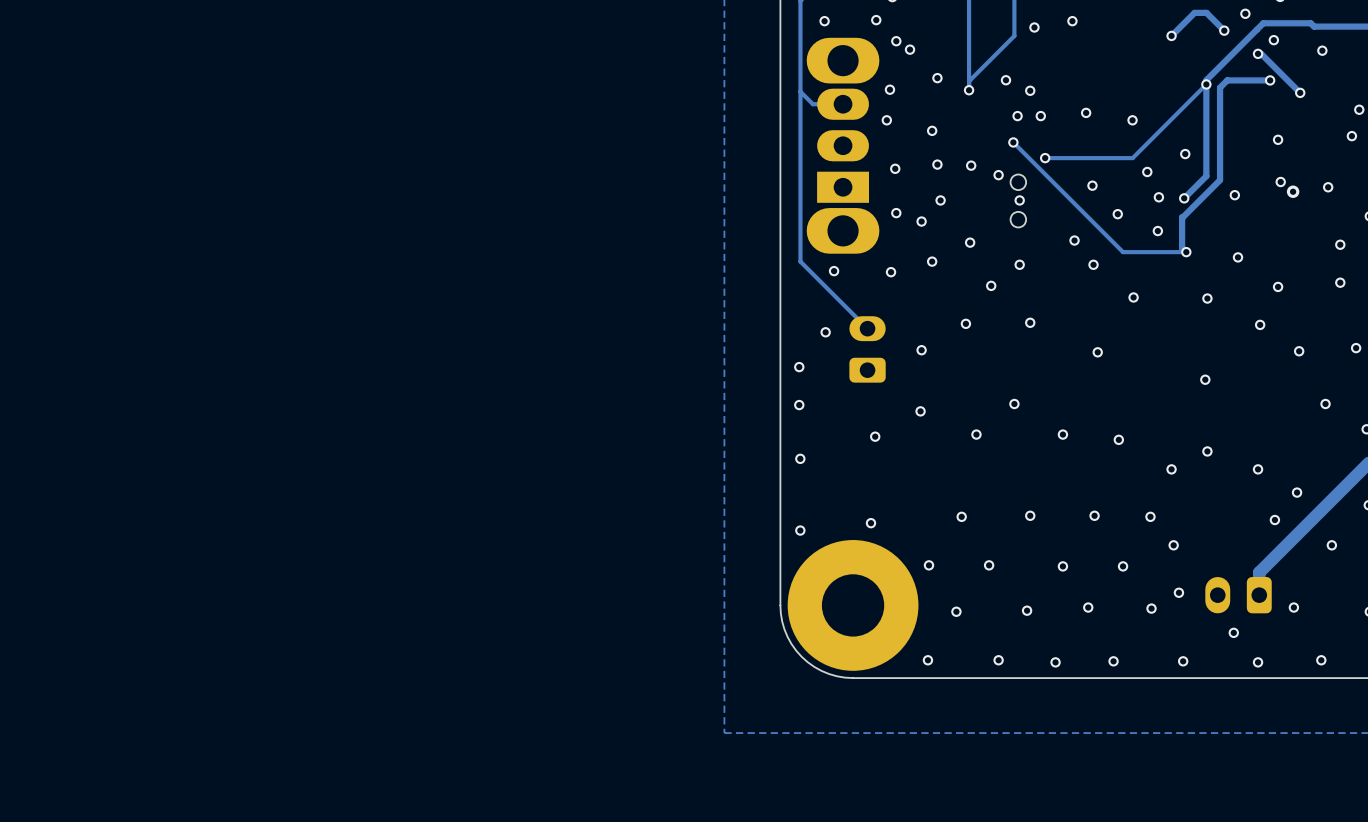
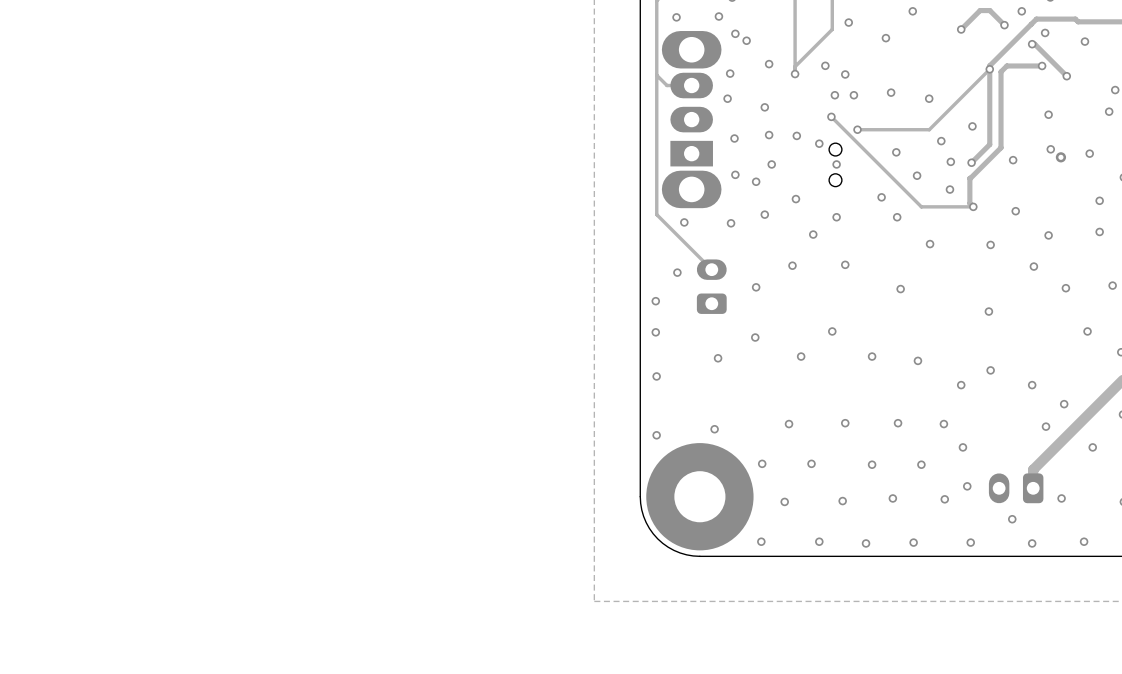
via: none -> (912, 11)
via: (1072, 21) -> none
via: none -> (885, 38)

